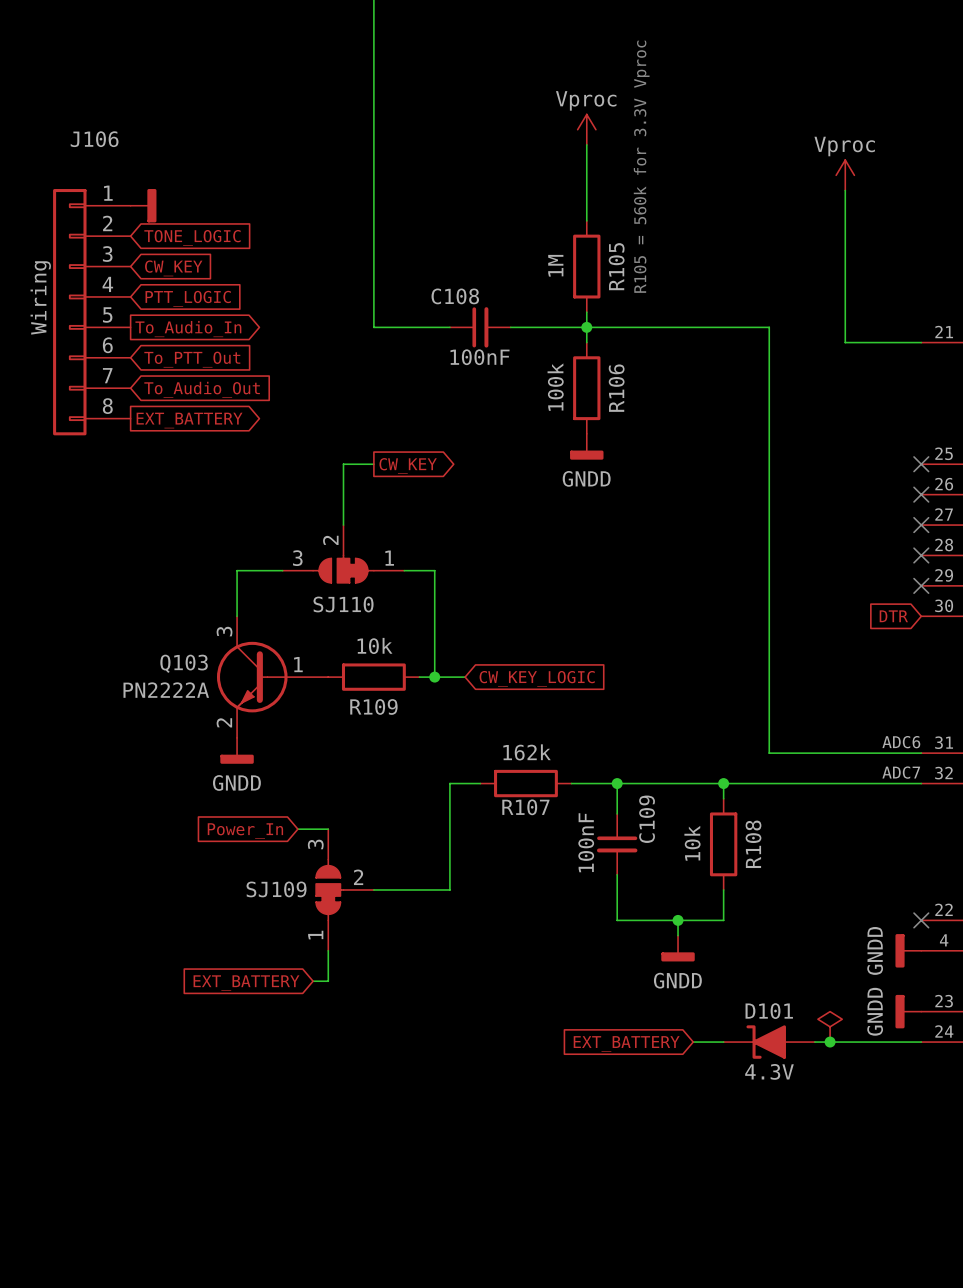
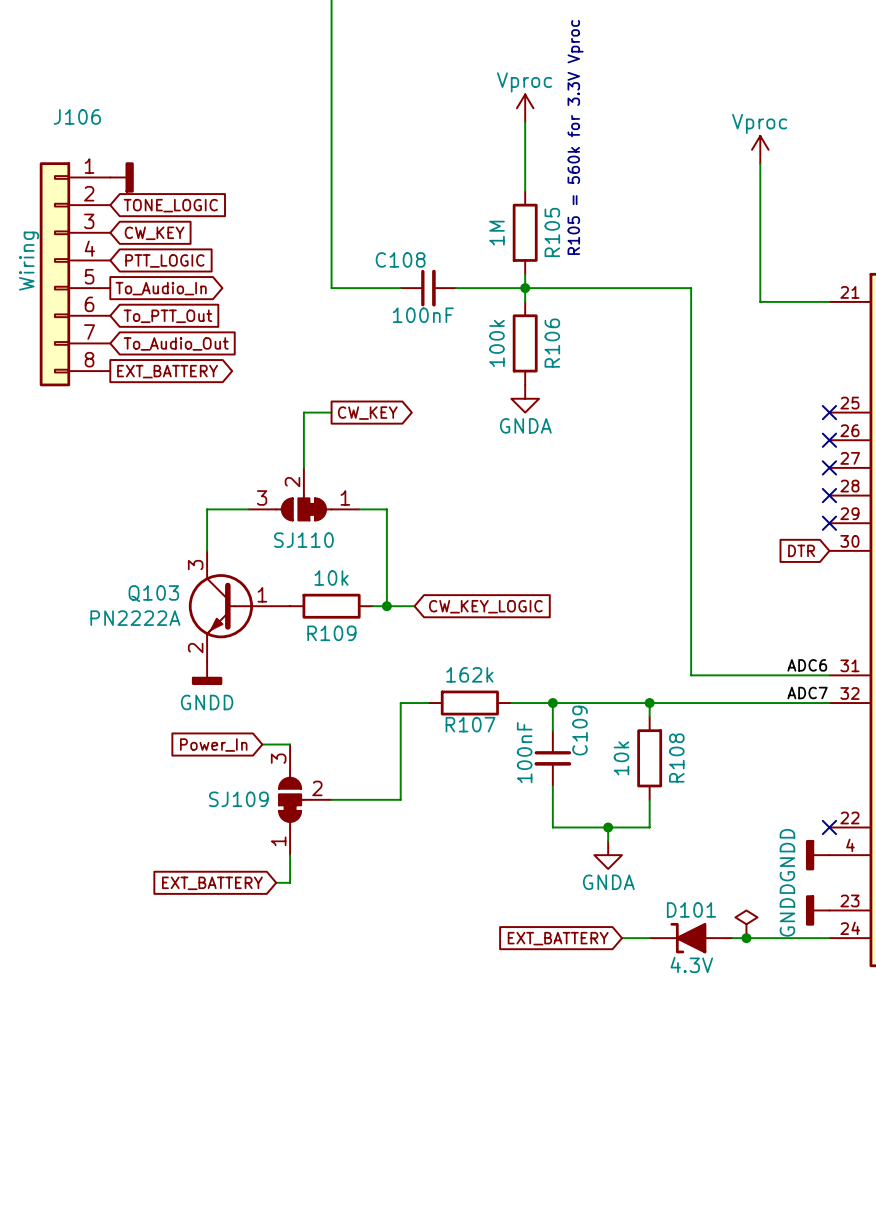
power symbol: GNDD (586, 446) -> GNDA (525, 398)
power symbol: GNDD (678, 948) -> GNDA (608, 855)

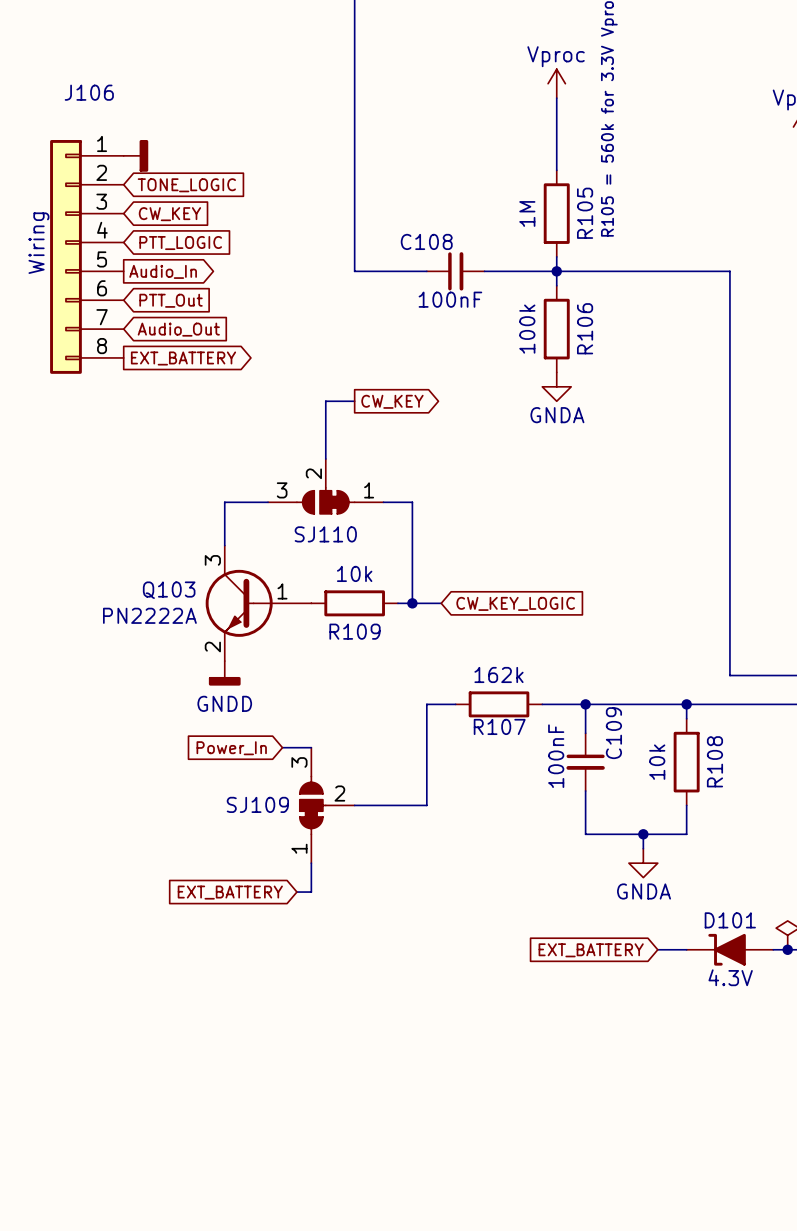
global label: To_Audio_In (161, 288) -> Audio_In (163, 271)
global label: To_PTT_Out (167, 316) -> PTT_Out (171, 300)
global label: To_Audio_Out (176, 343) -> Audio_Out (178, 329)

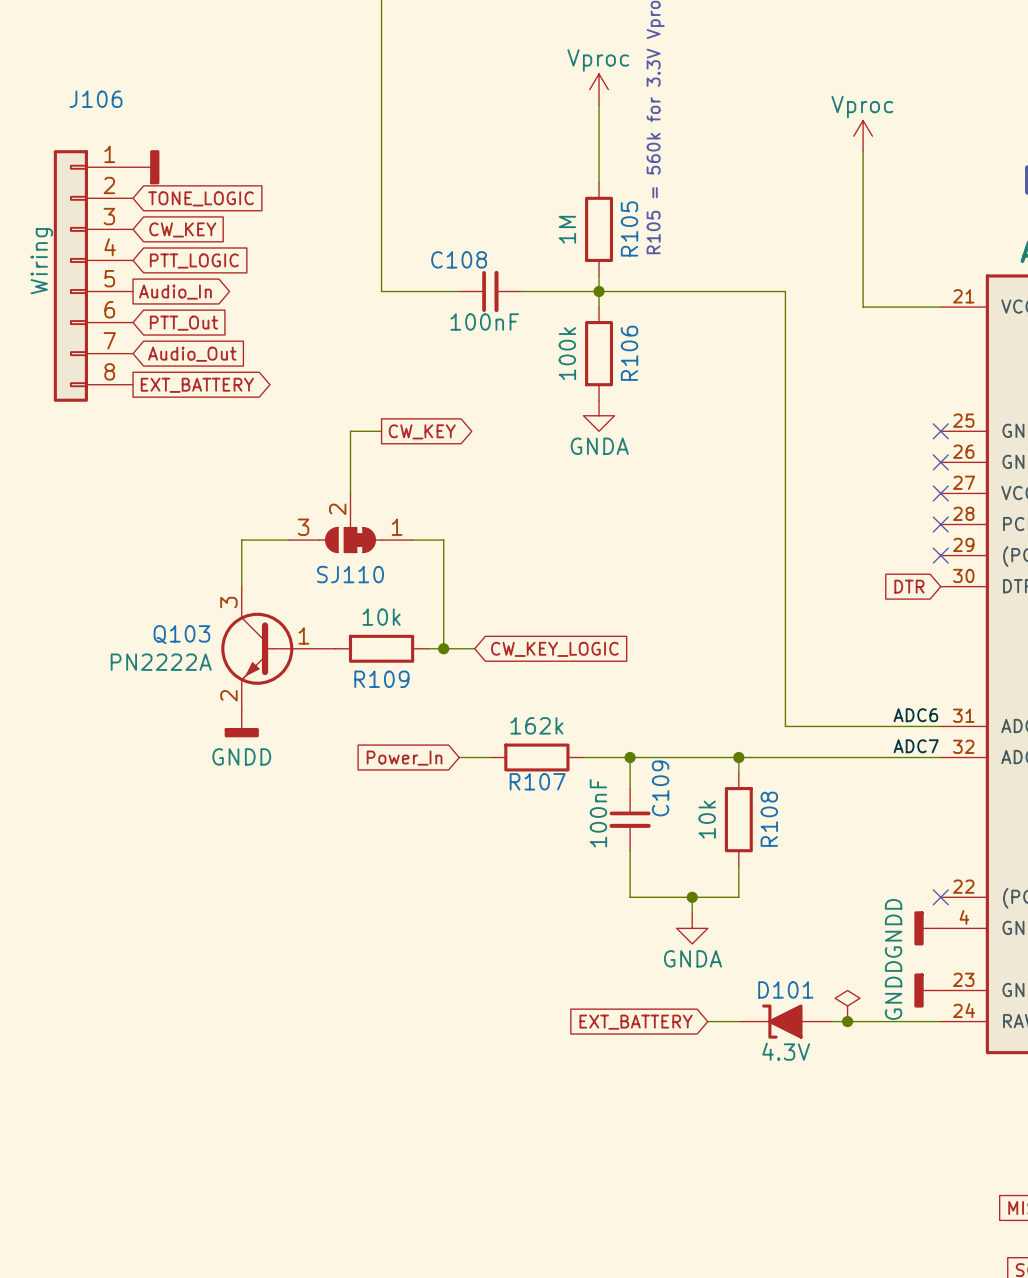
wire: (426, 704) (426, 805) (354, 805) -> none
wire: (282, 747) (311, 747) -> none
global label position: Power_In (231, 748) -> Power_In (404, 758)
SJ109: (327, 805) -> none
wire: (311, 863) (311, 892) (296, 892) -> none
global label: EXT_BATTERY (230, 892) -> none

